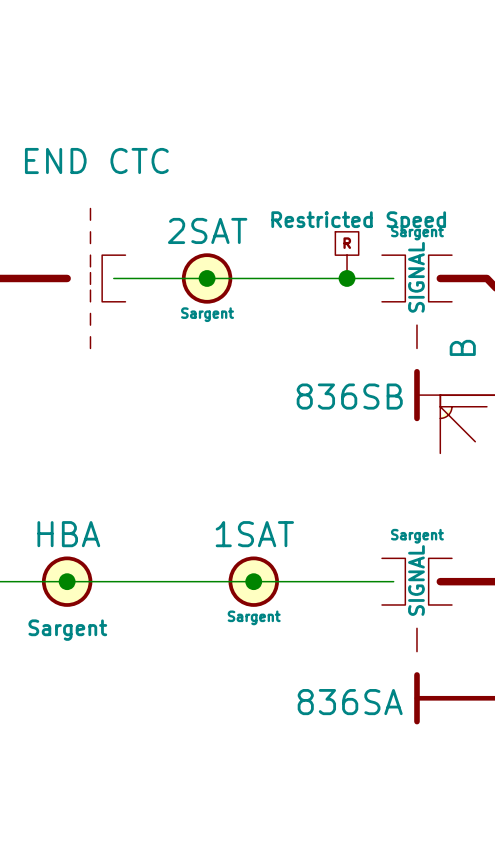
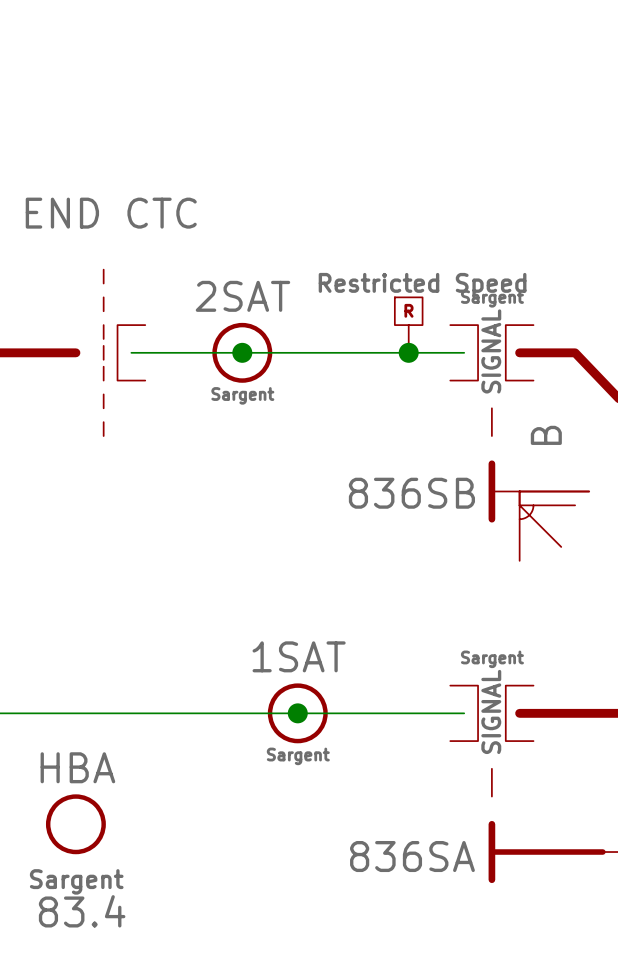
junction: (67, 581) -> none
part: HBA (67, 581) -> none
part: none -> HBA (75, 824)

